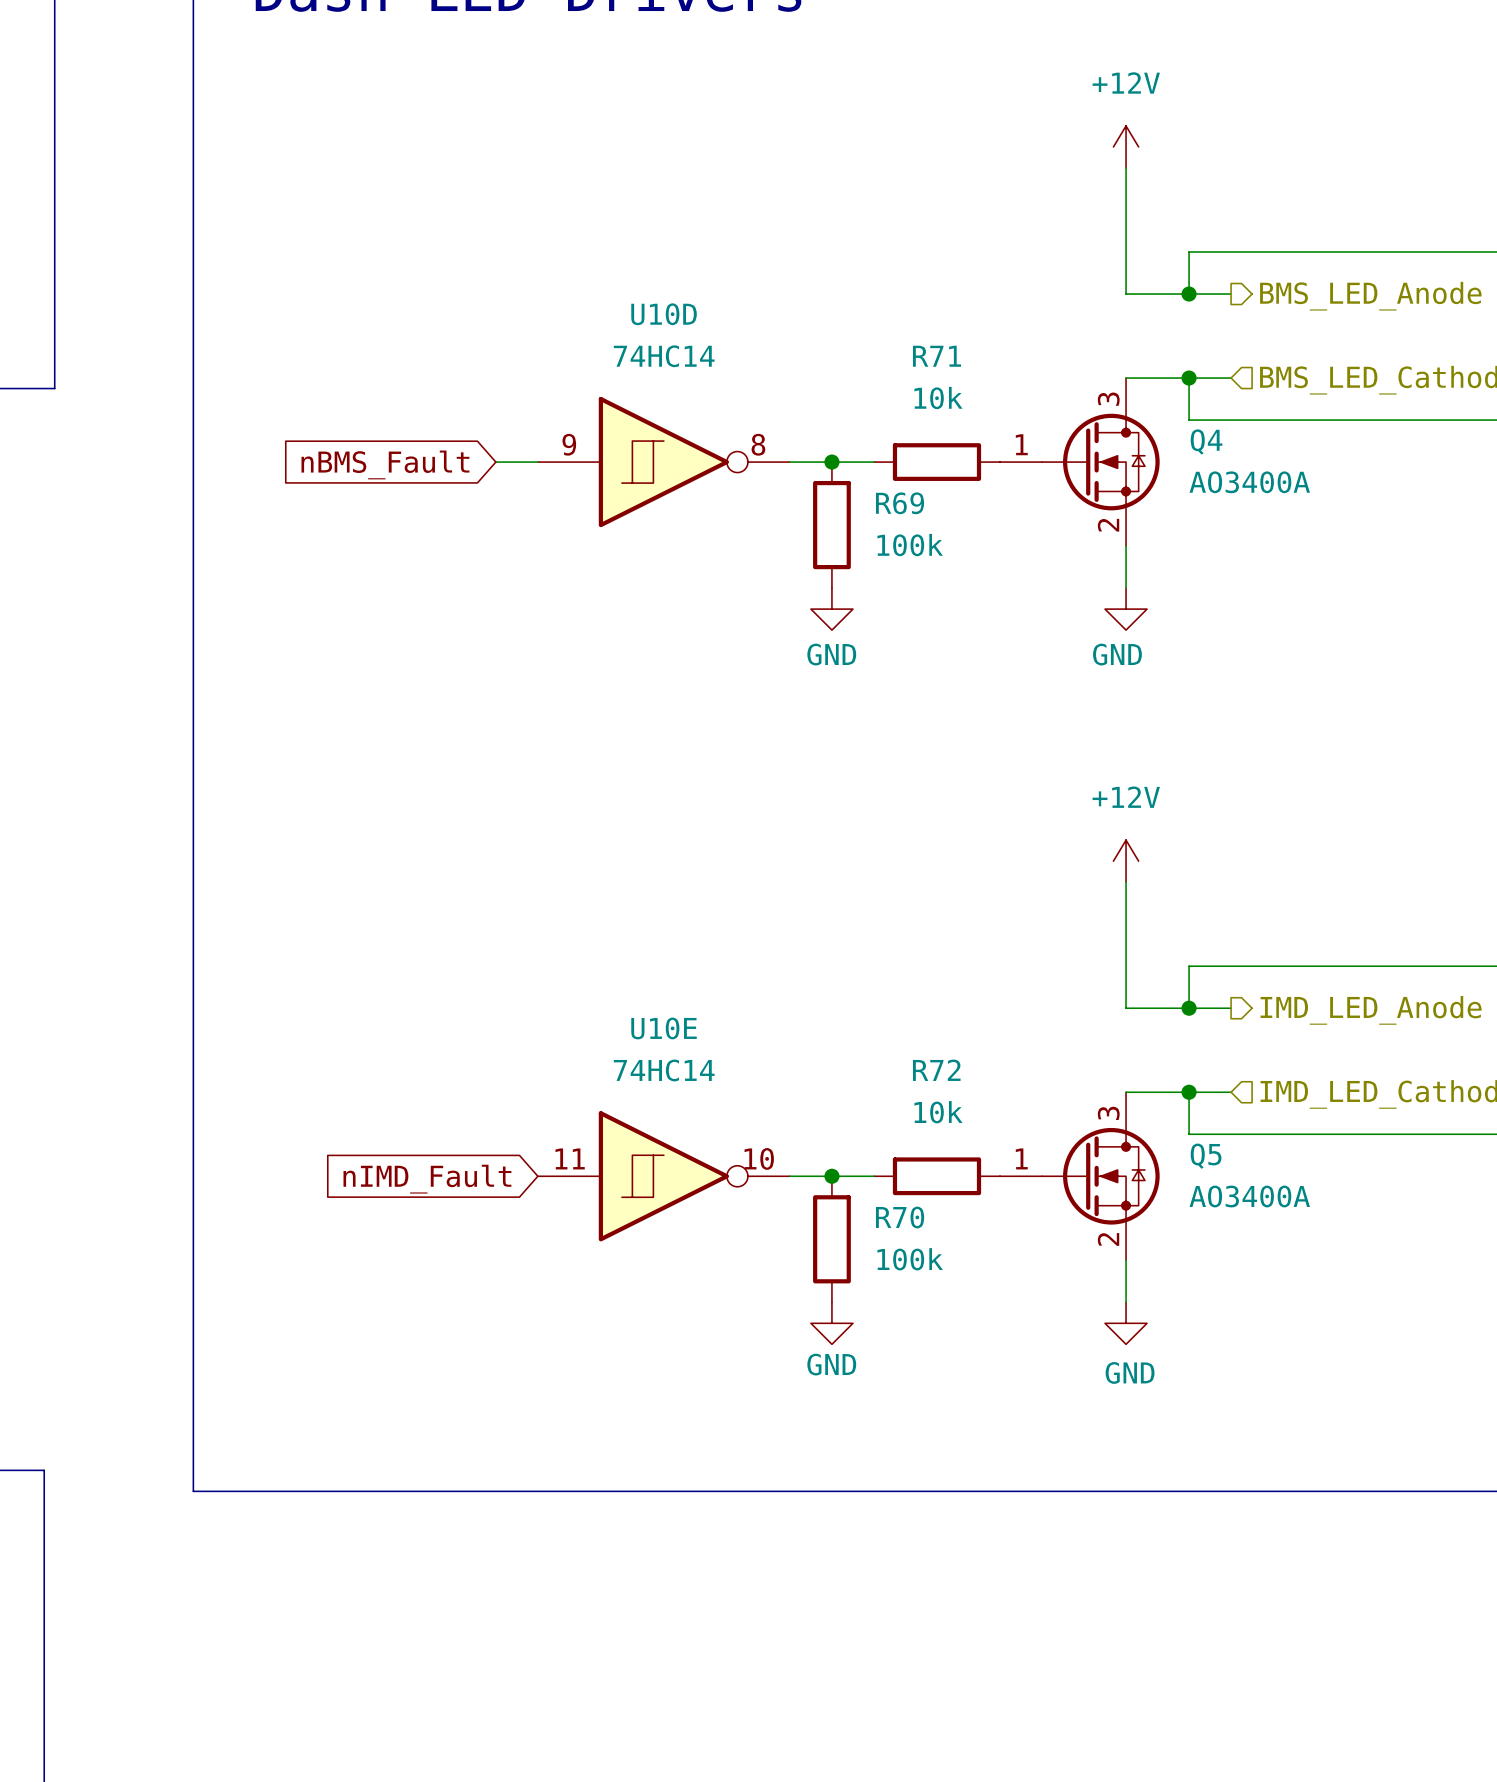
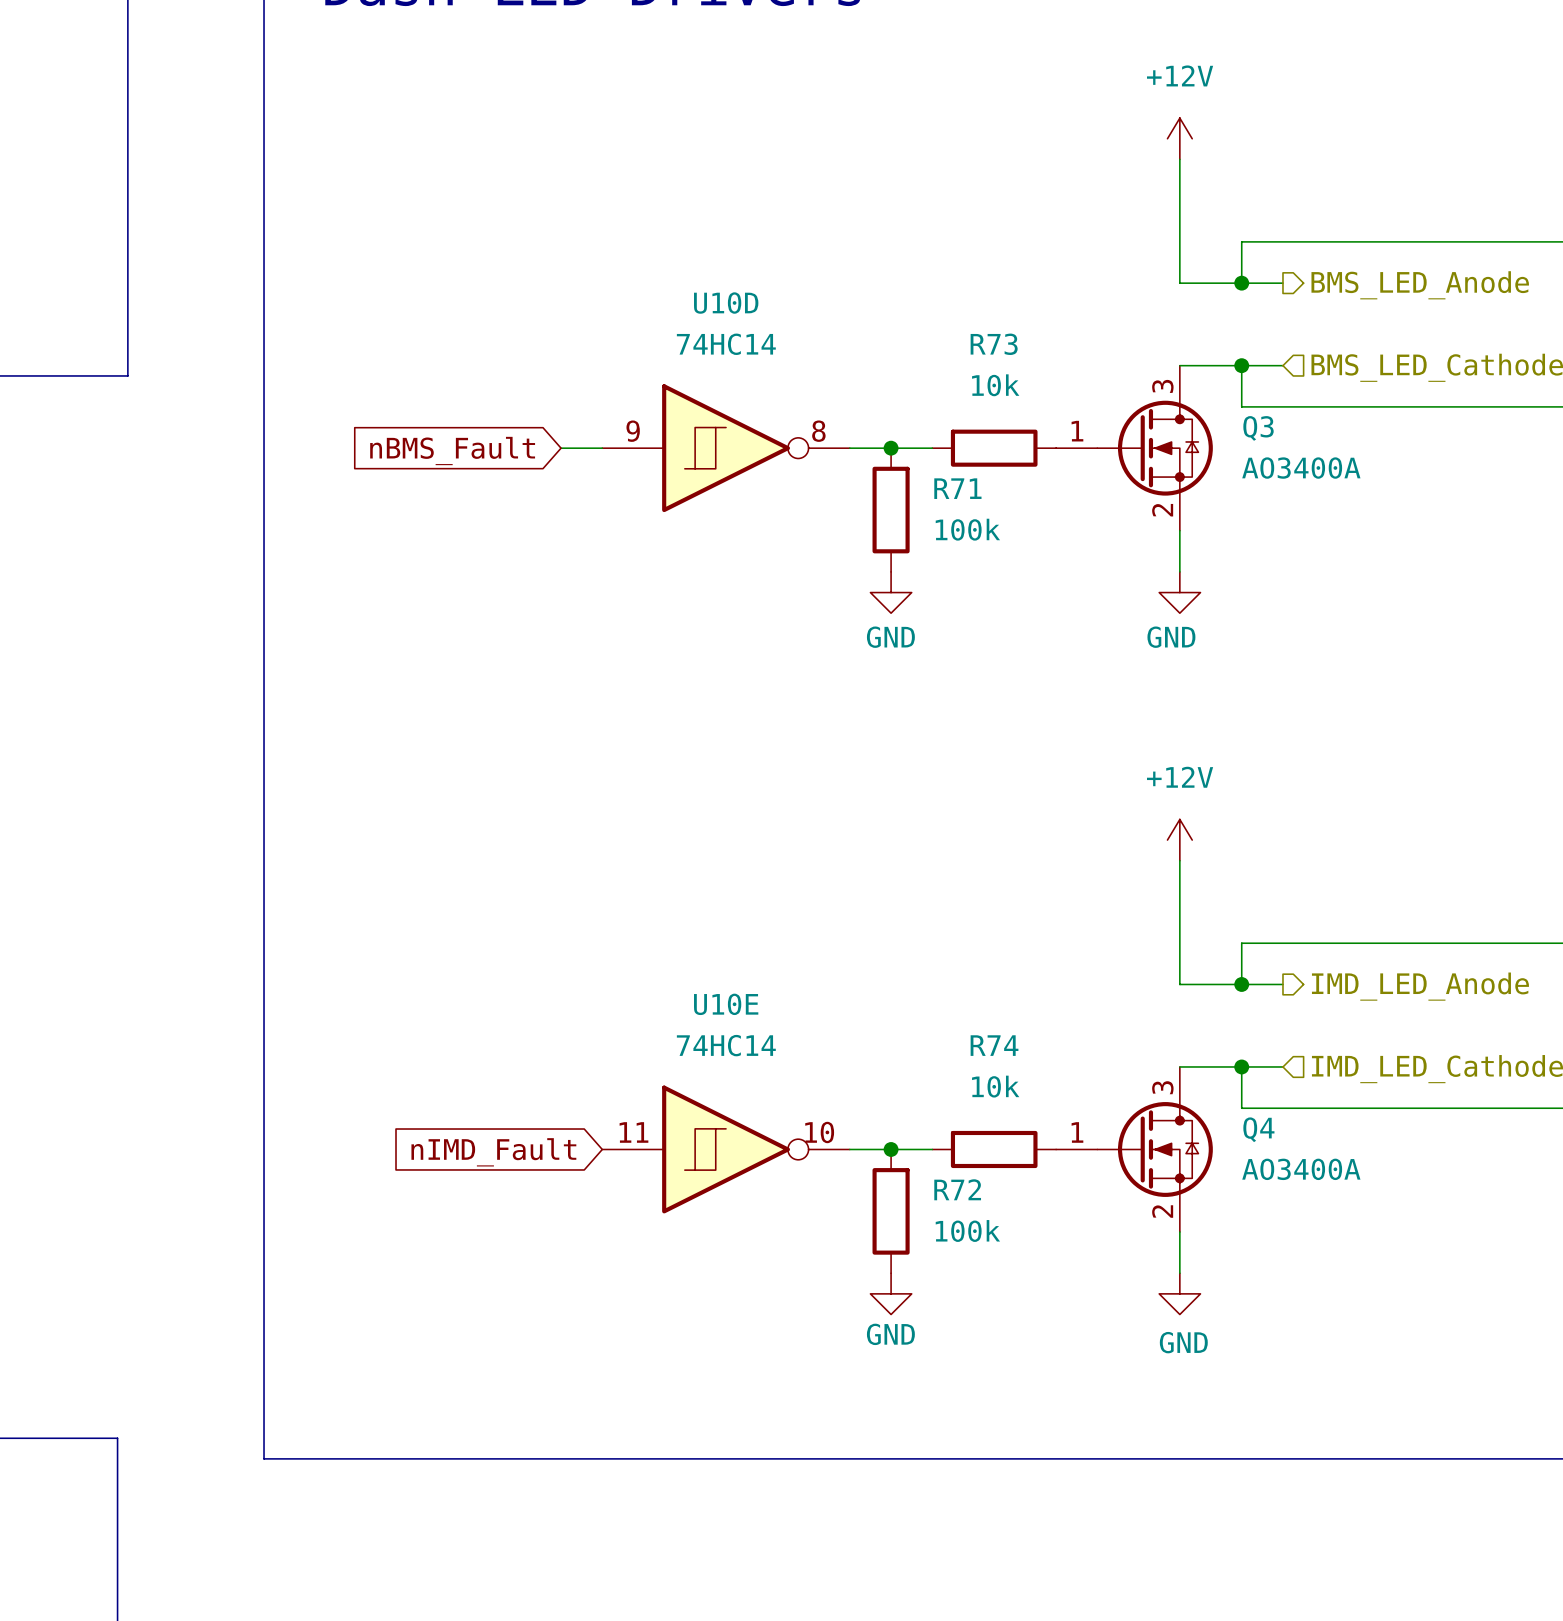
R71 name: R71 (937, 356) -> R73 (994, 344)
Q4 name: Q4 (1206, 441) -> Q3 (1258, 428)
R69 name: R69 (900, 503) -> R71 (957, 488)
R72 name: R72 (936, 1070) -> R74 (994, 1045)
Q5 name: Q5 (1206, 1156) -> Q4 (1258, 1129)
R70 name: R70 (900, 1217) -> R72 (957, 1189)

